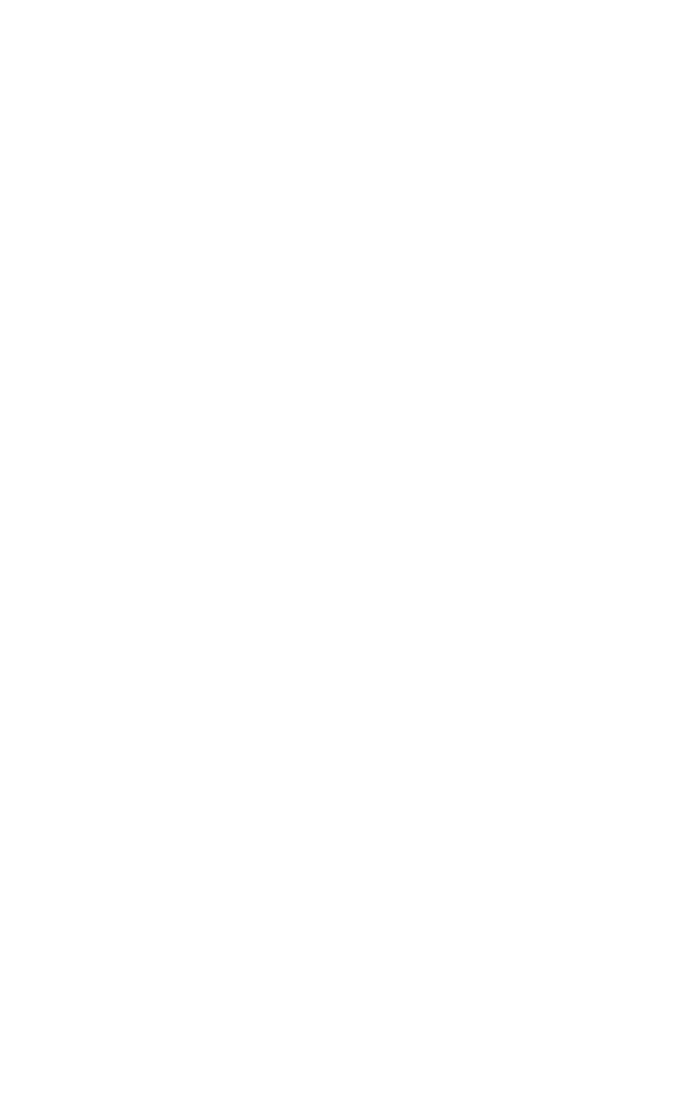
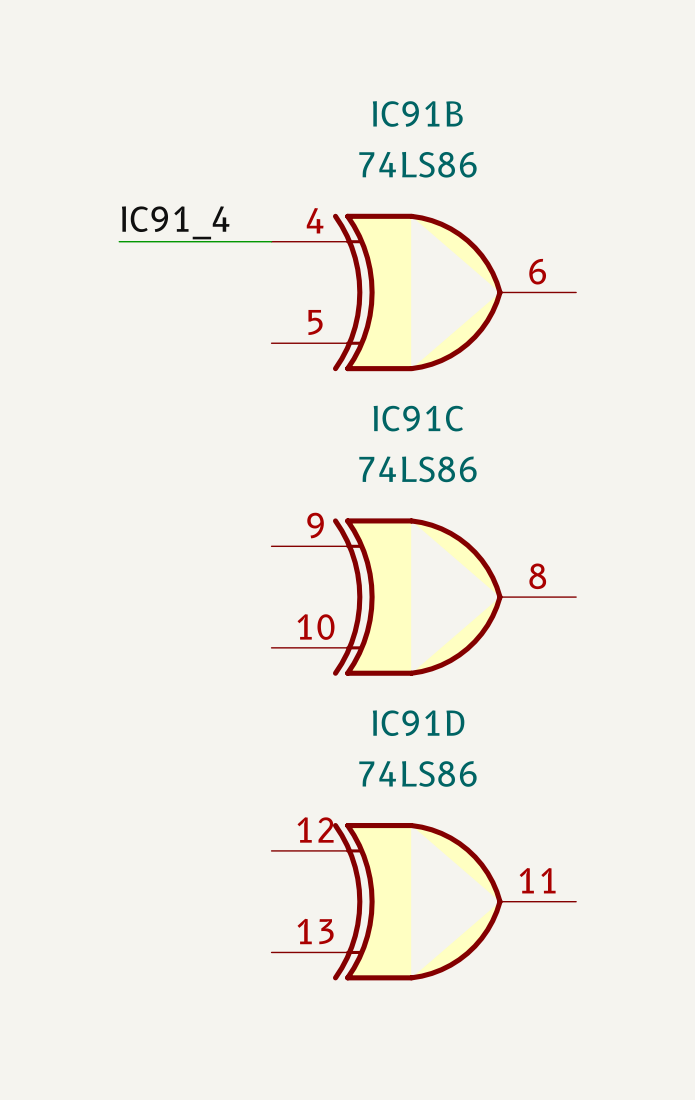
label: none -> IC91_4 (175, 222)
wire: none -> (119, 241) (271, 241)
IC91B: none -> 74LS86 (423, 292)
IC91C: none -> 74LS86 (423, 597)
IC91D: none -> 74LS86 (423, 901)

